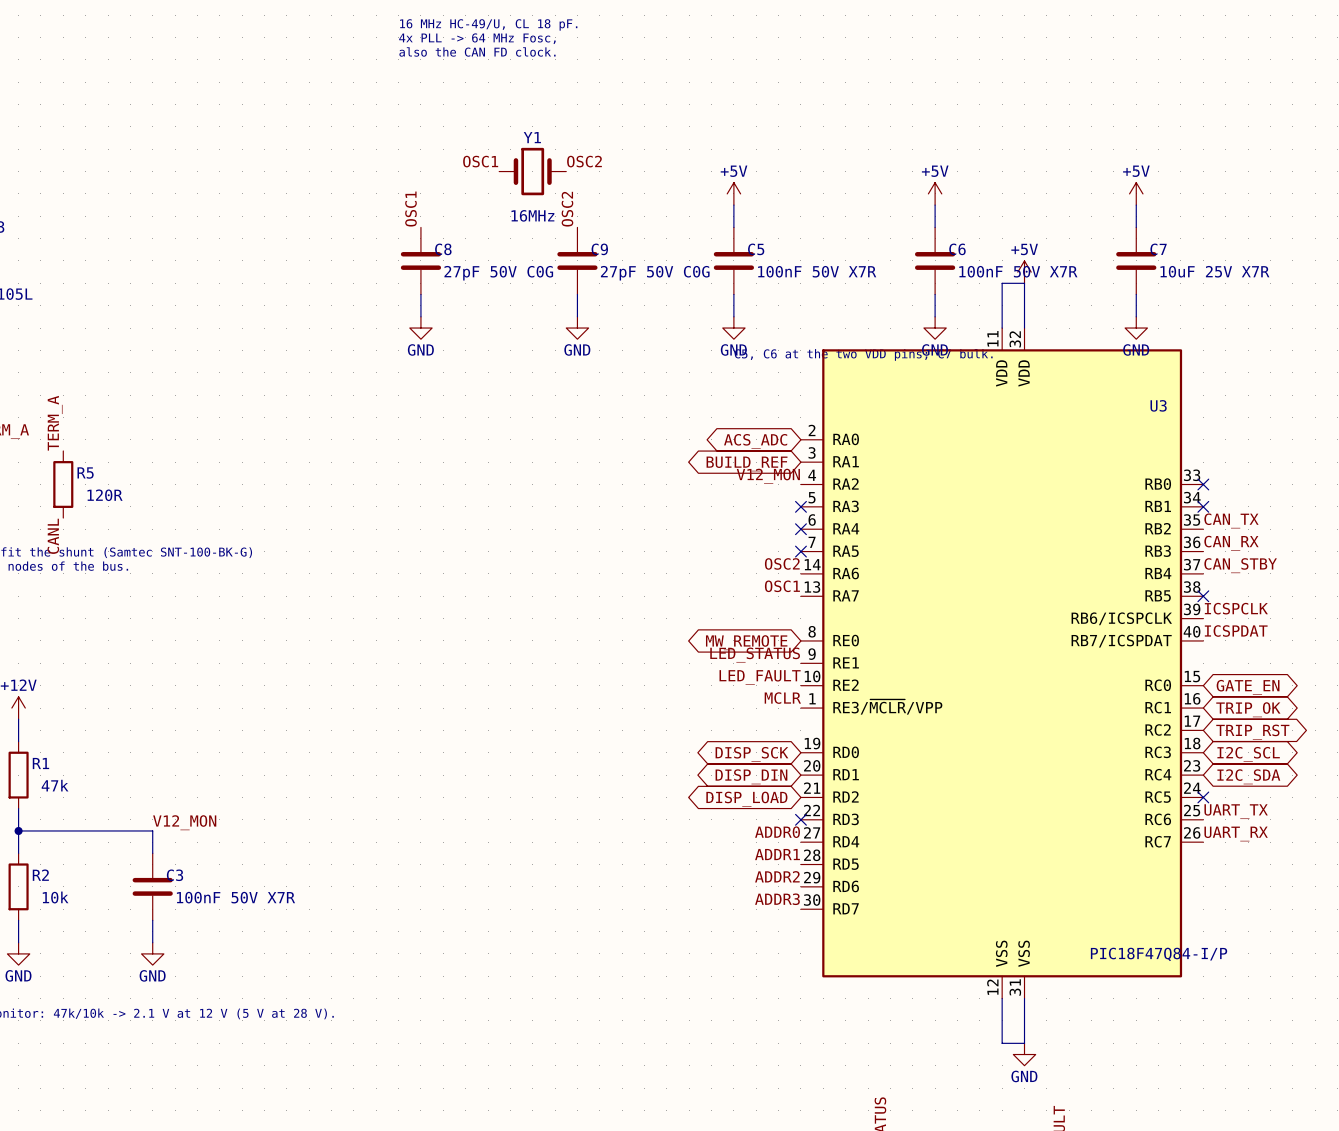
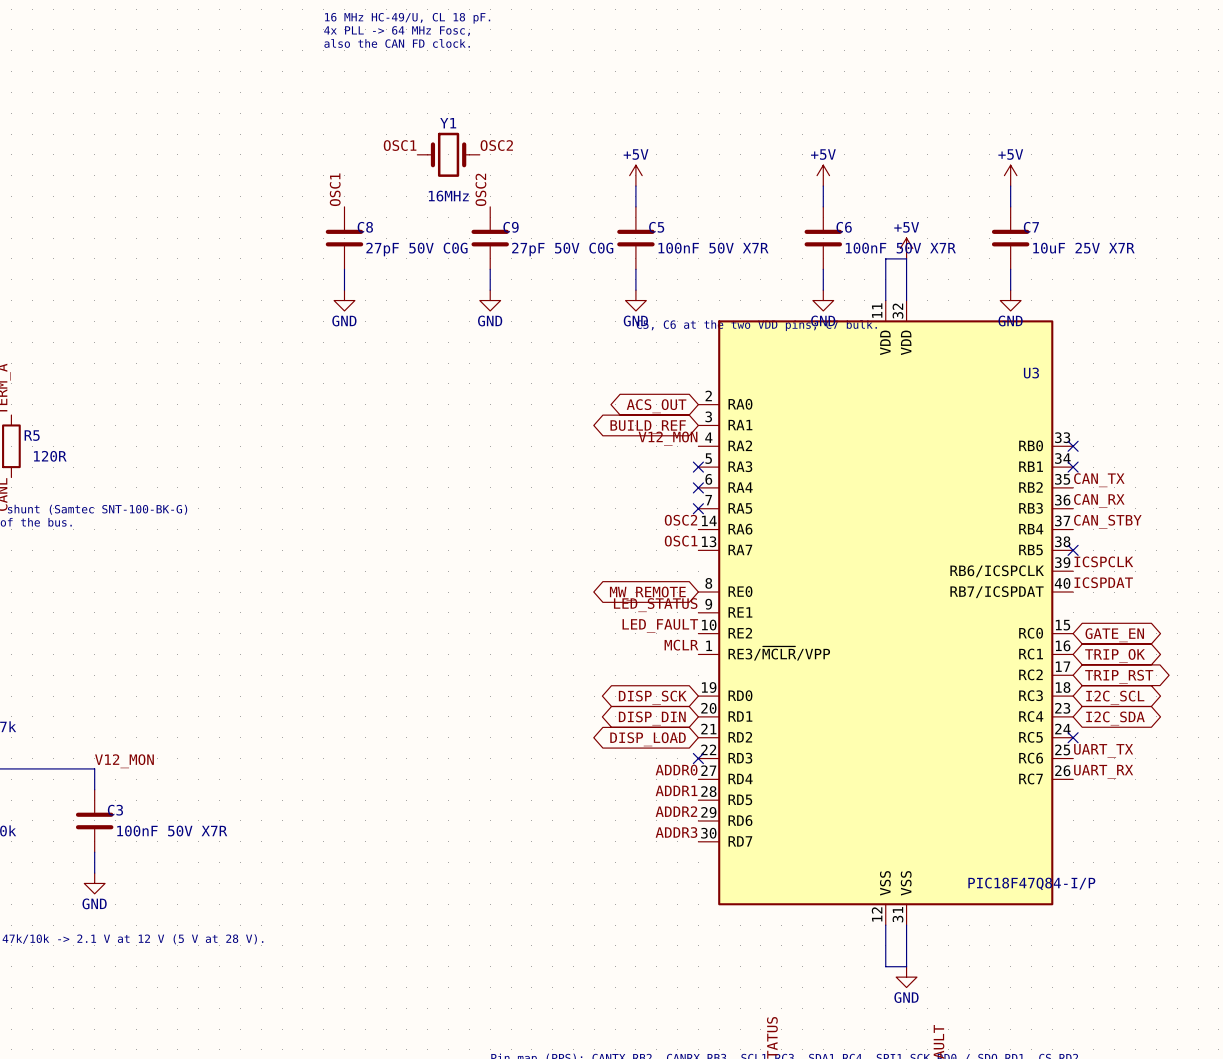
global label: ACS_ADC (755, 441) -> ACS_OUT (656, 406)

